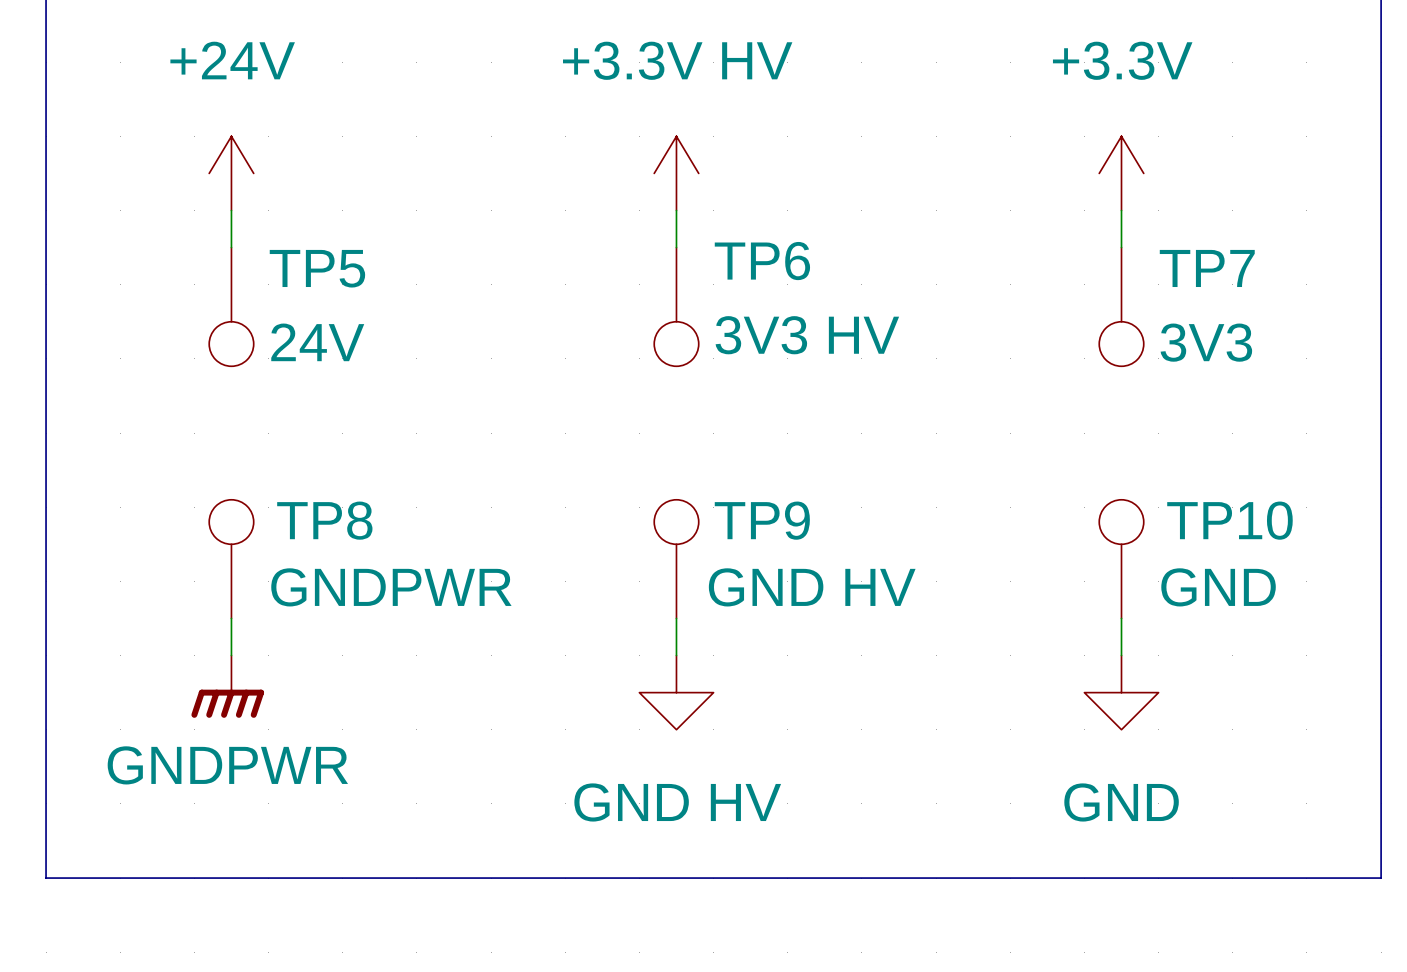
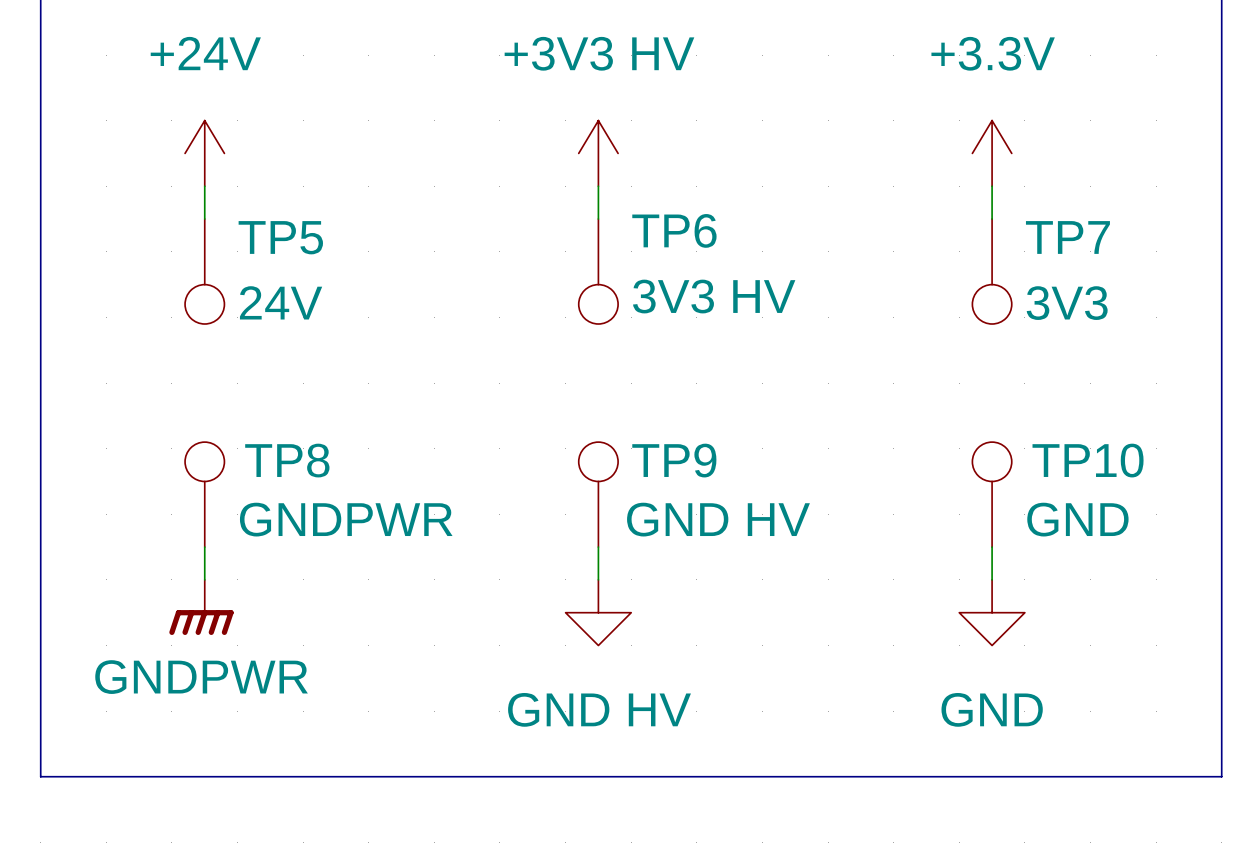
power symbol: +3.3V HV (676, 173) -> +3V3 HV (598, 153)

